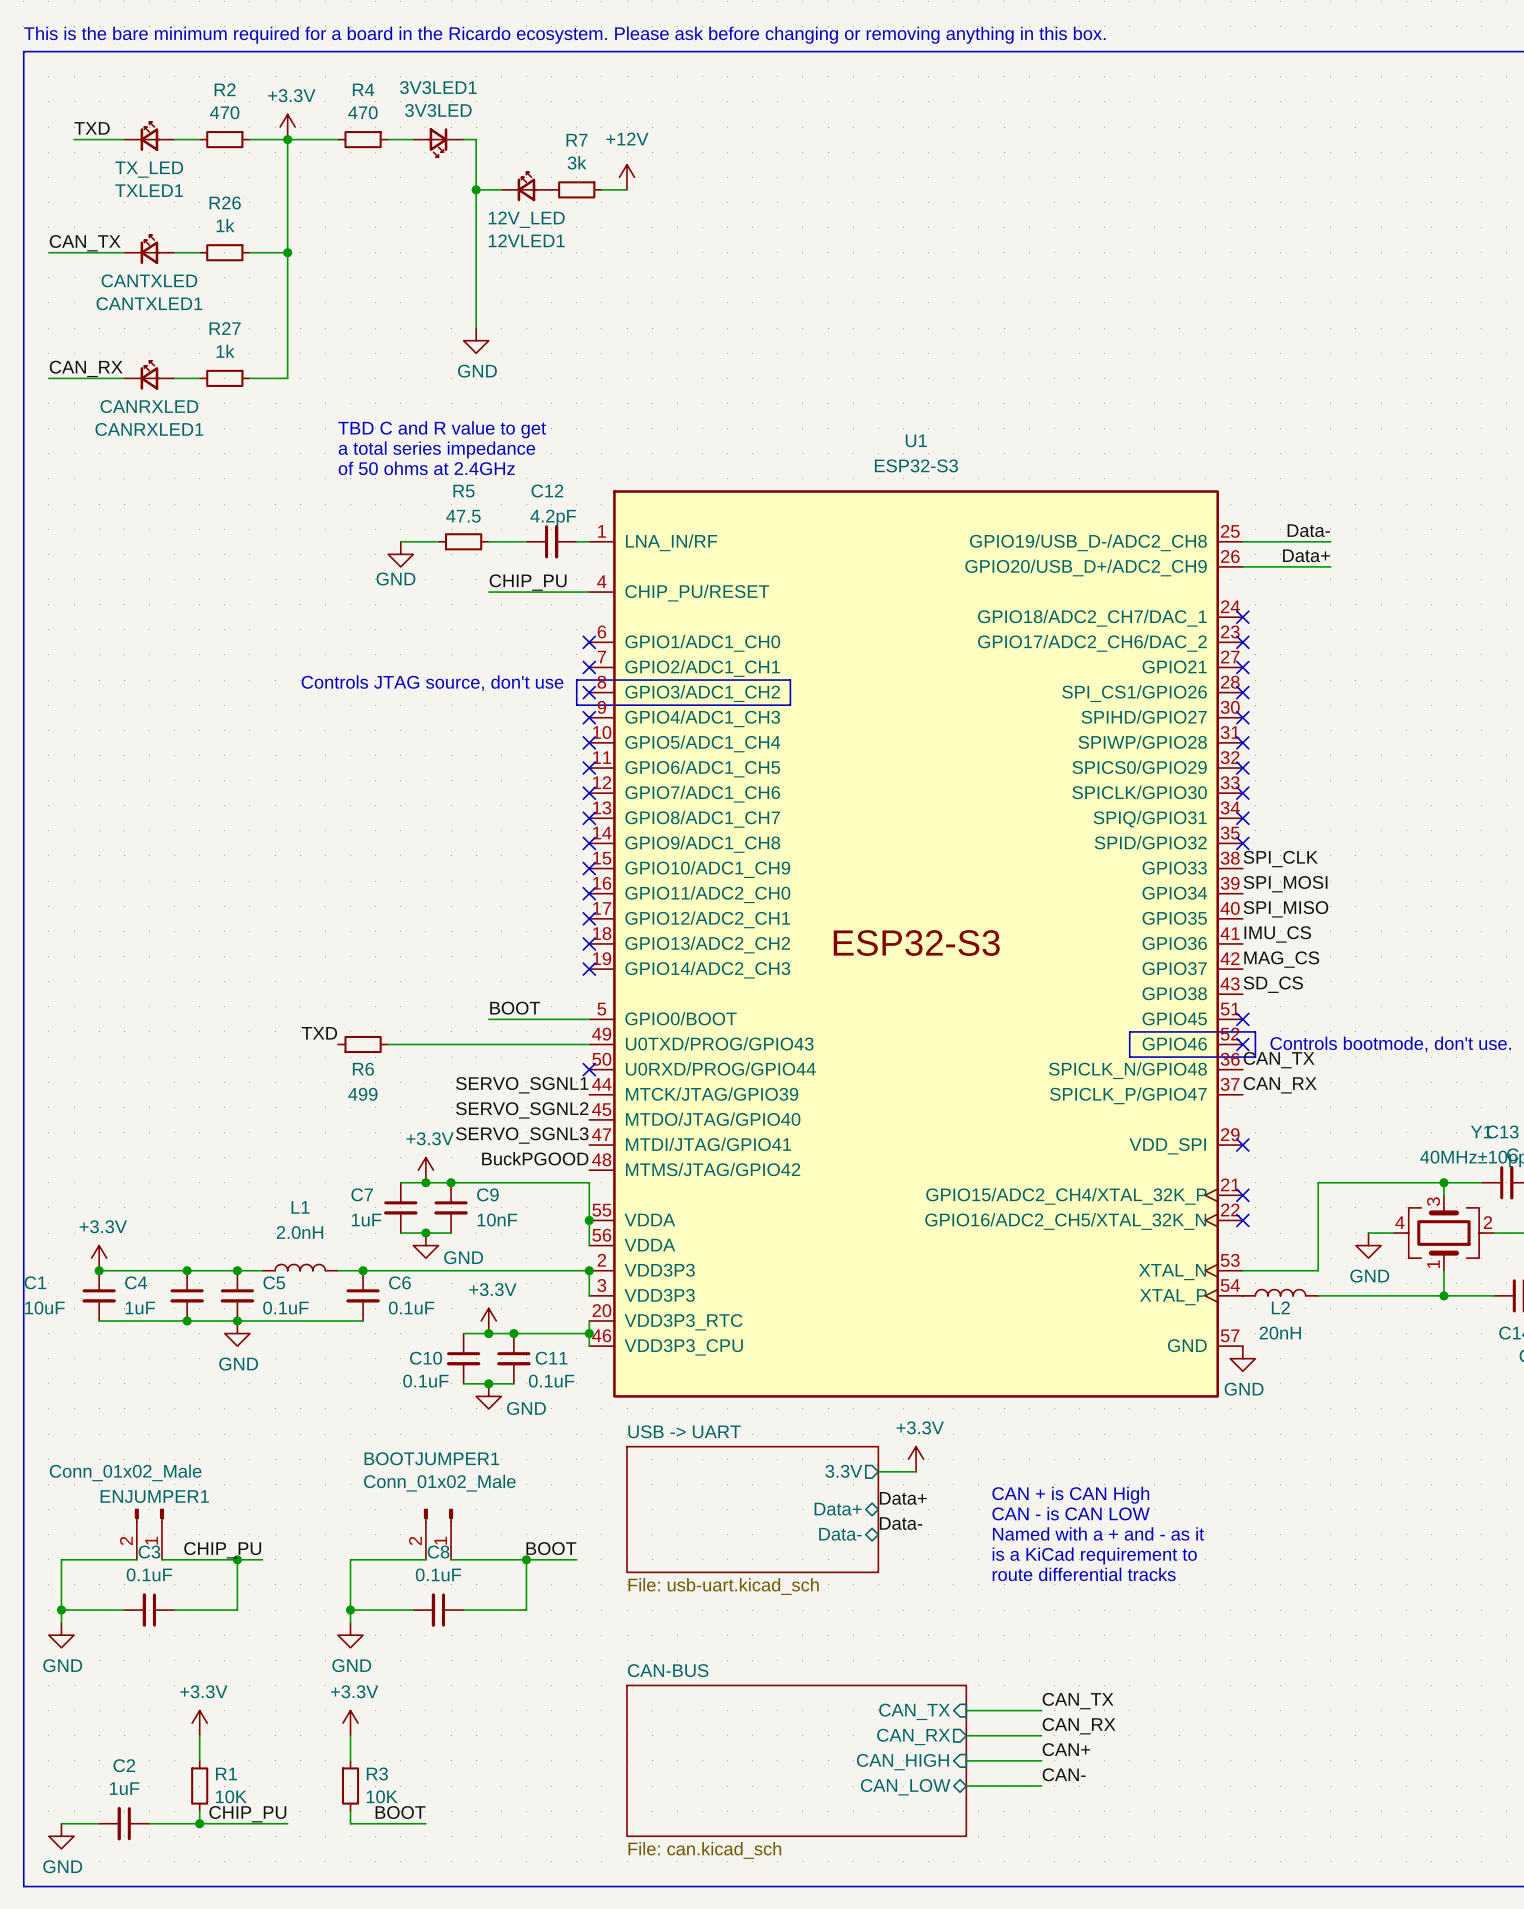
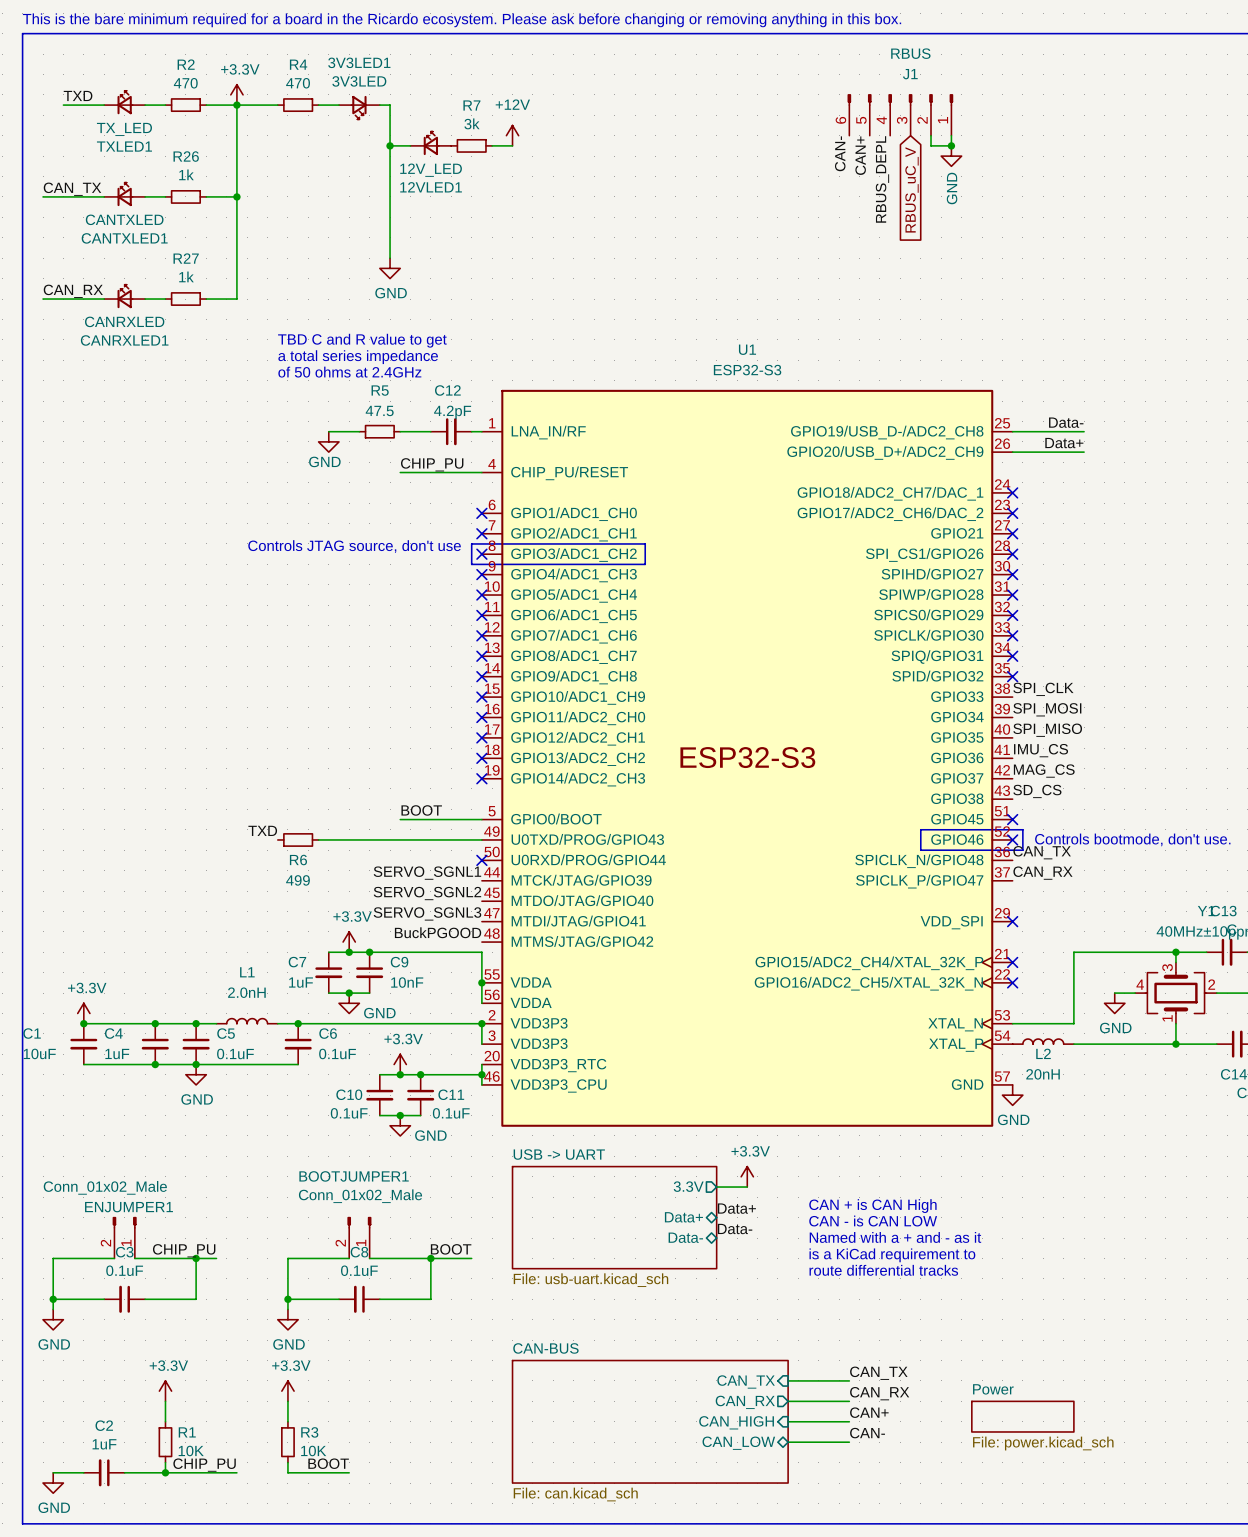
J1: none -> RBUS (900, 114)
wire: none -> (931, 135) (931, 145) (951, 145) (951, 135)
junction: none -> (951, 145)
label: none -> CAN- (840, 153)
label: none -> CAN+ (860, 155)
power symbol: none -> GND (951, 156)
label: none -> RBUS_DEPL (882, 179)
global label: none -> RBUS_uC_V (911, 189)
sheet Power: none -> File: power.kicad_sch (1022, 1416)

